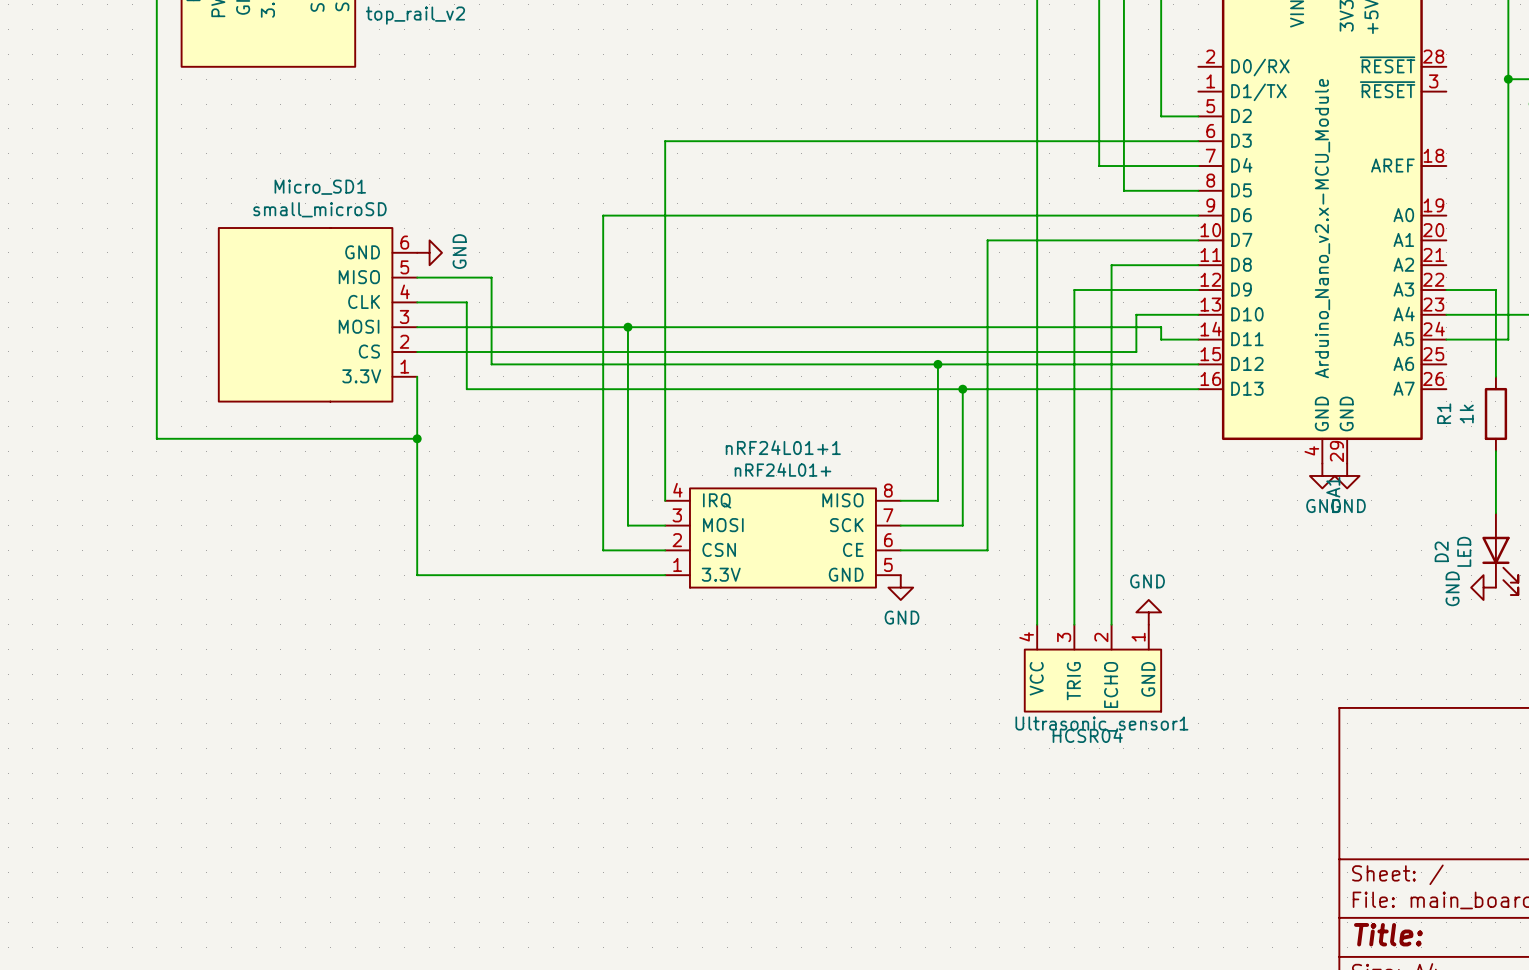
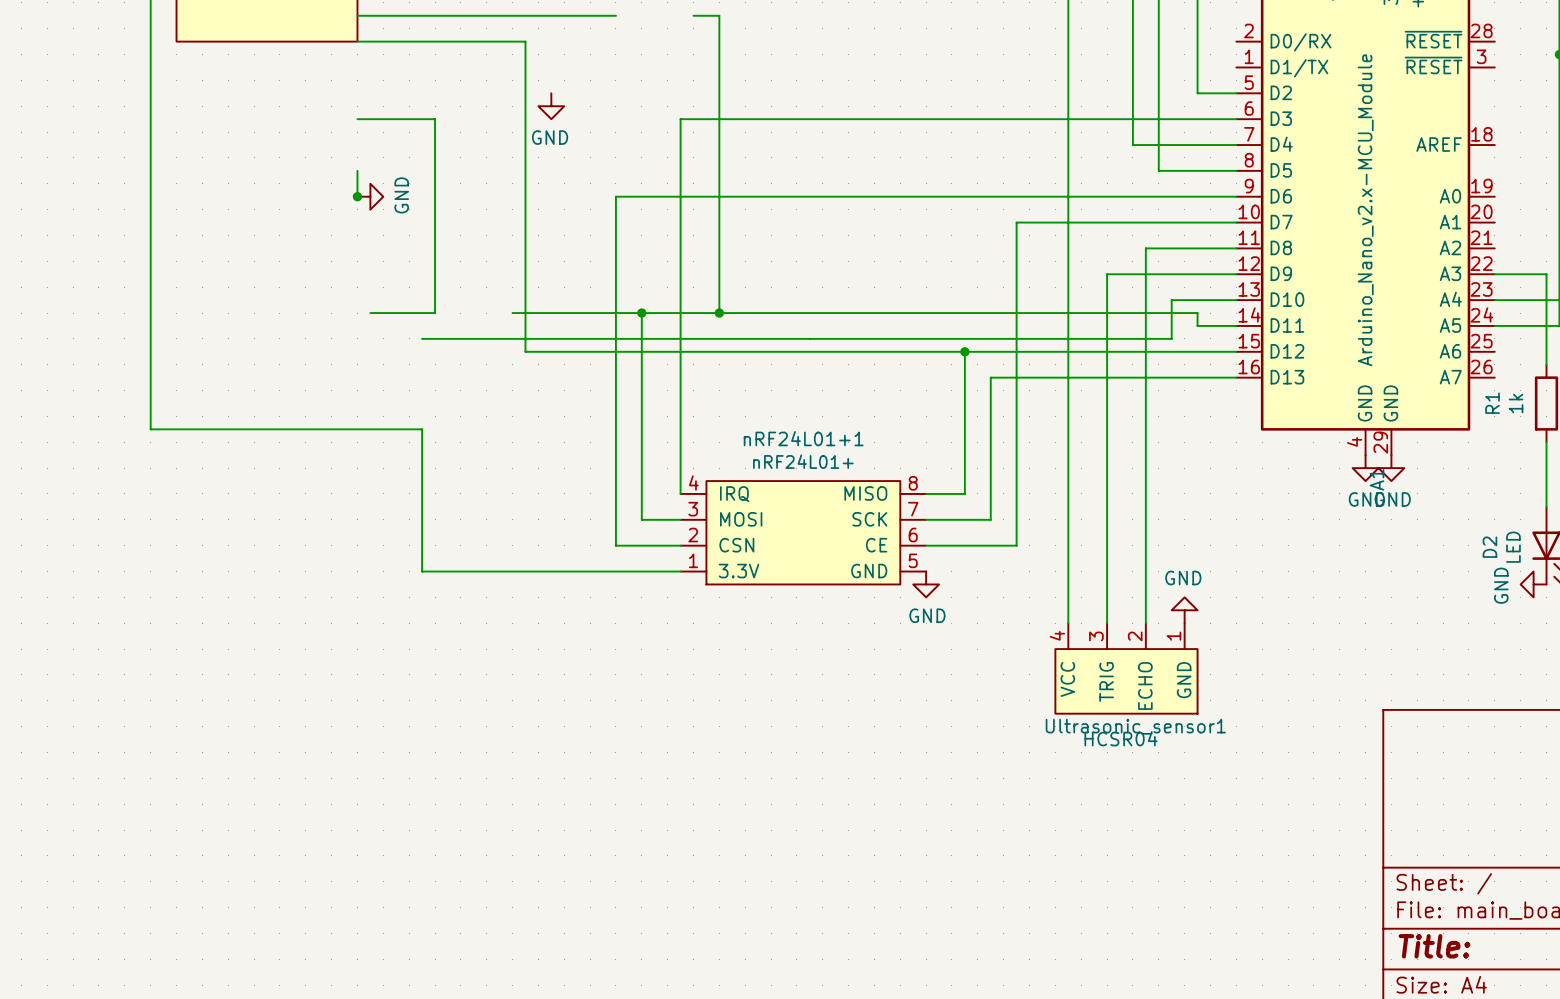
wire: none -> (357, 15) (615, 15)
wire: none -> (693, 15) (719, 15) (719, 313)
power symbol: none -> GND (551, 106)
wire: none -> (357, 170) (357, 196)
junction: none -> (357, 196)
power symbol position: GND (429, 252) -> GND (370, 196)
wire: (417, 277) (491, 277) (491, 364) (516, 364) -> (357, 41) (525, 41) (525, 351)
wire: (417, 302) (466, 302) (466, 389) (962, 389) -> none
Micro_SD1: small_microSD (317, 314) -> none
wire: (429, 327) (503, 327) -> (435, 313) (435, 119) (357, 119)
junction: none -> (719, 313)
wire: (417, 376) (417, 438) -> none
junction: (962, 389) -> none
junction: (417, 438) -> none

